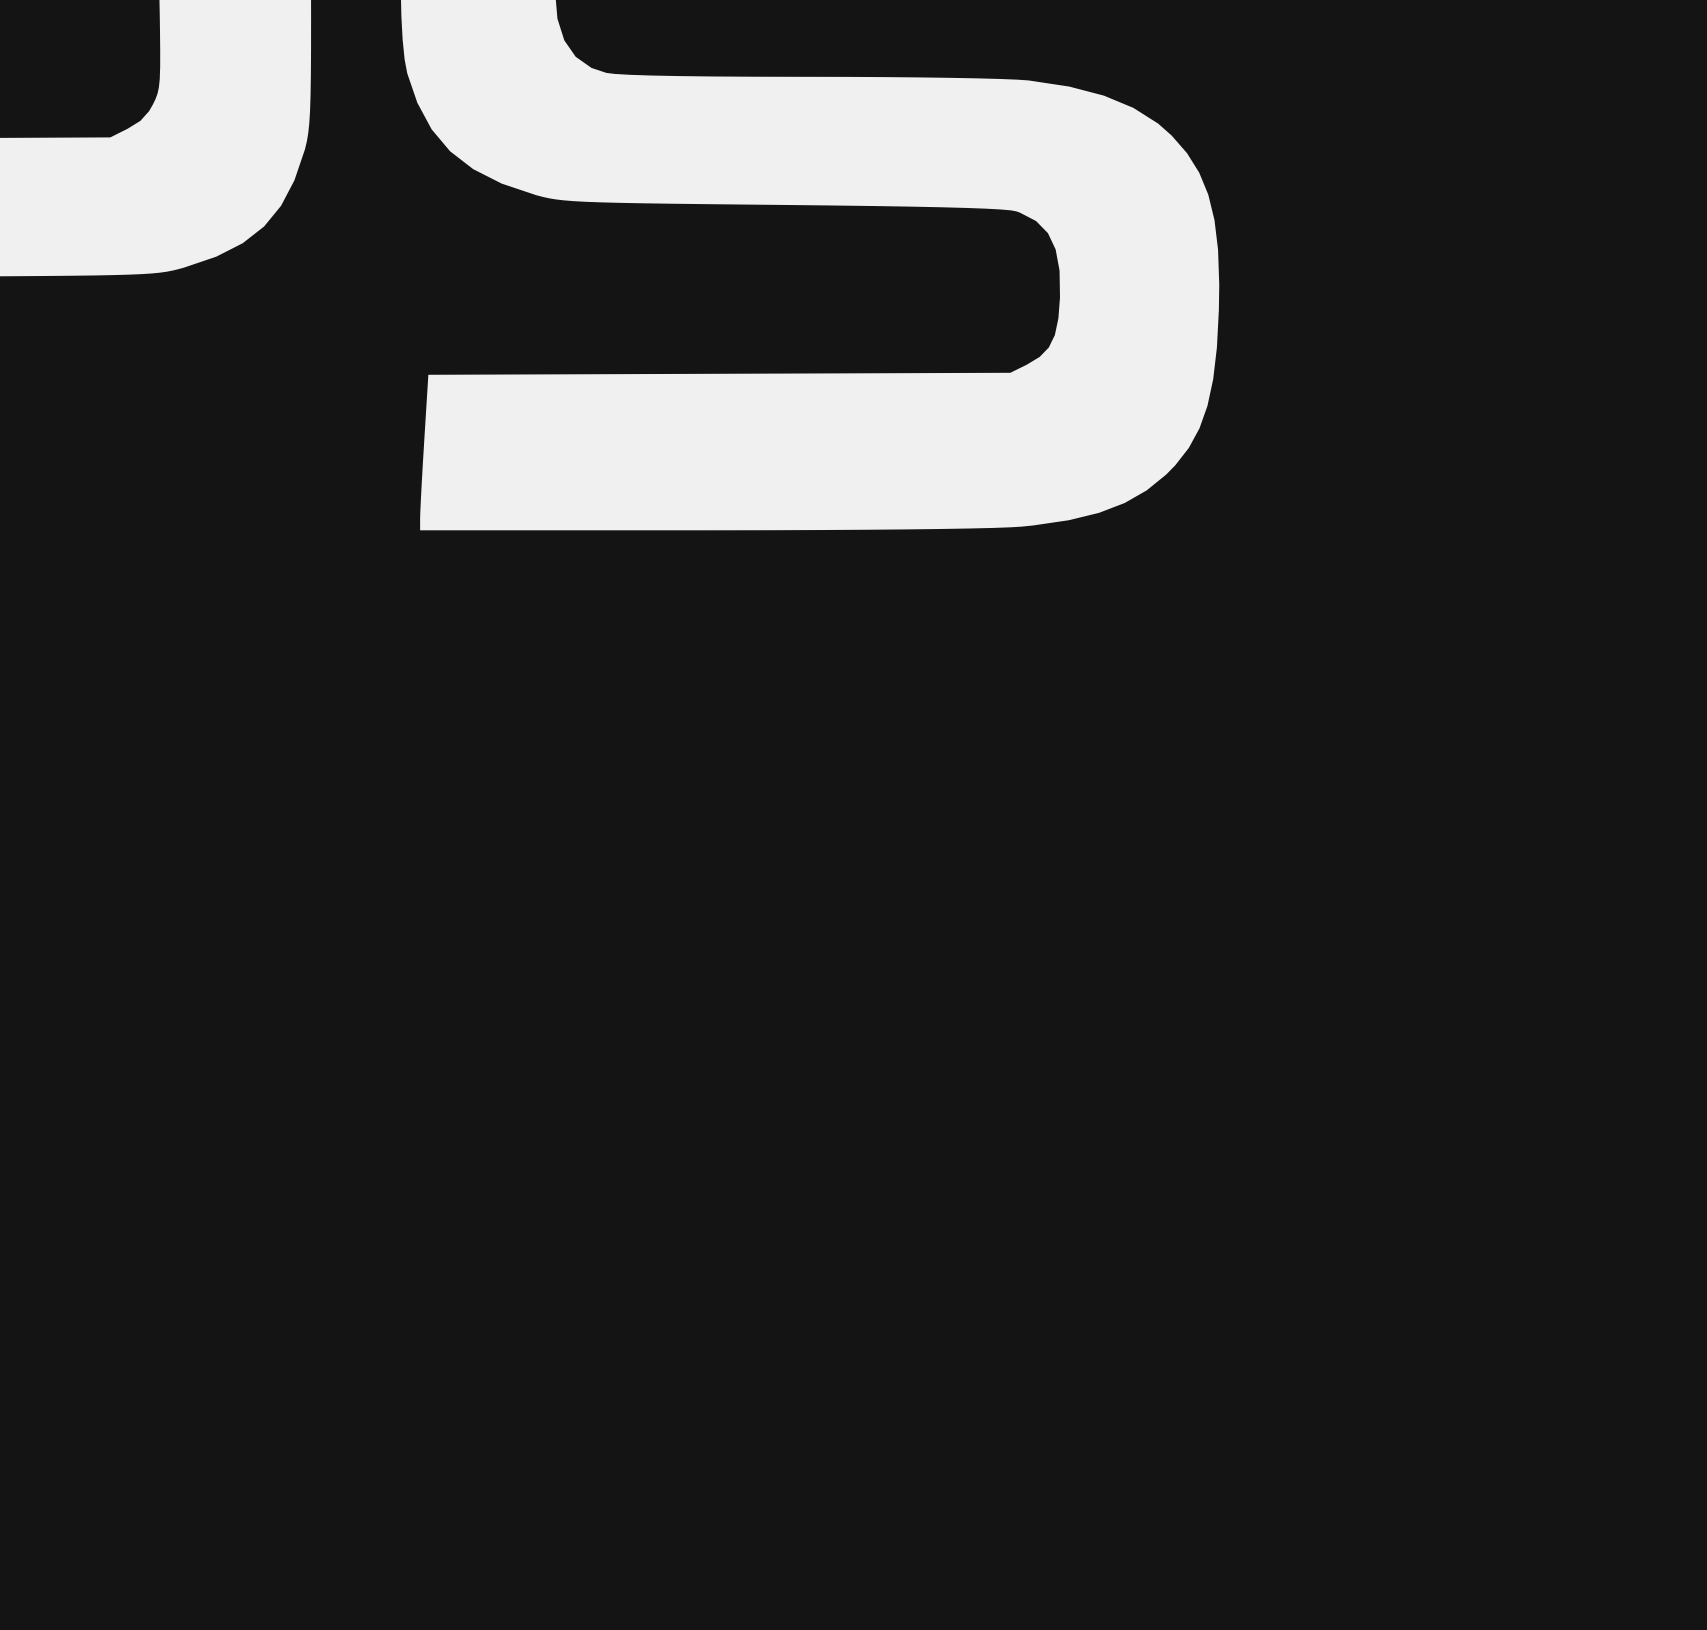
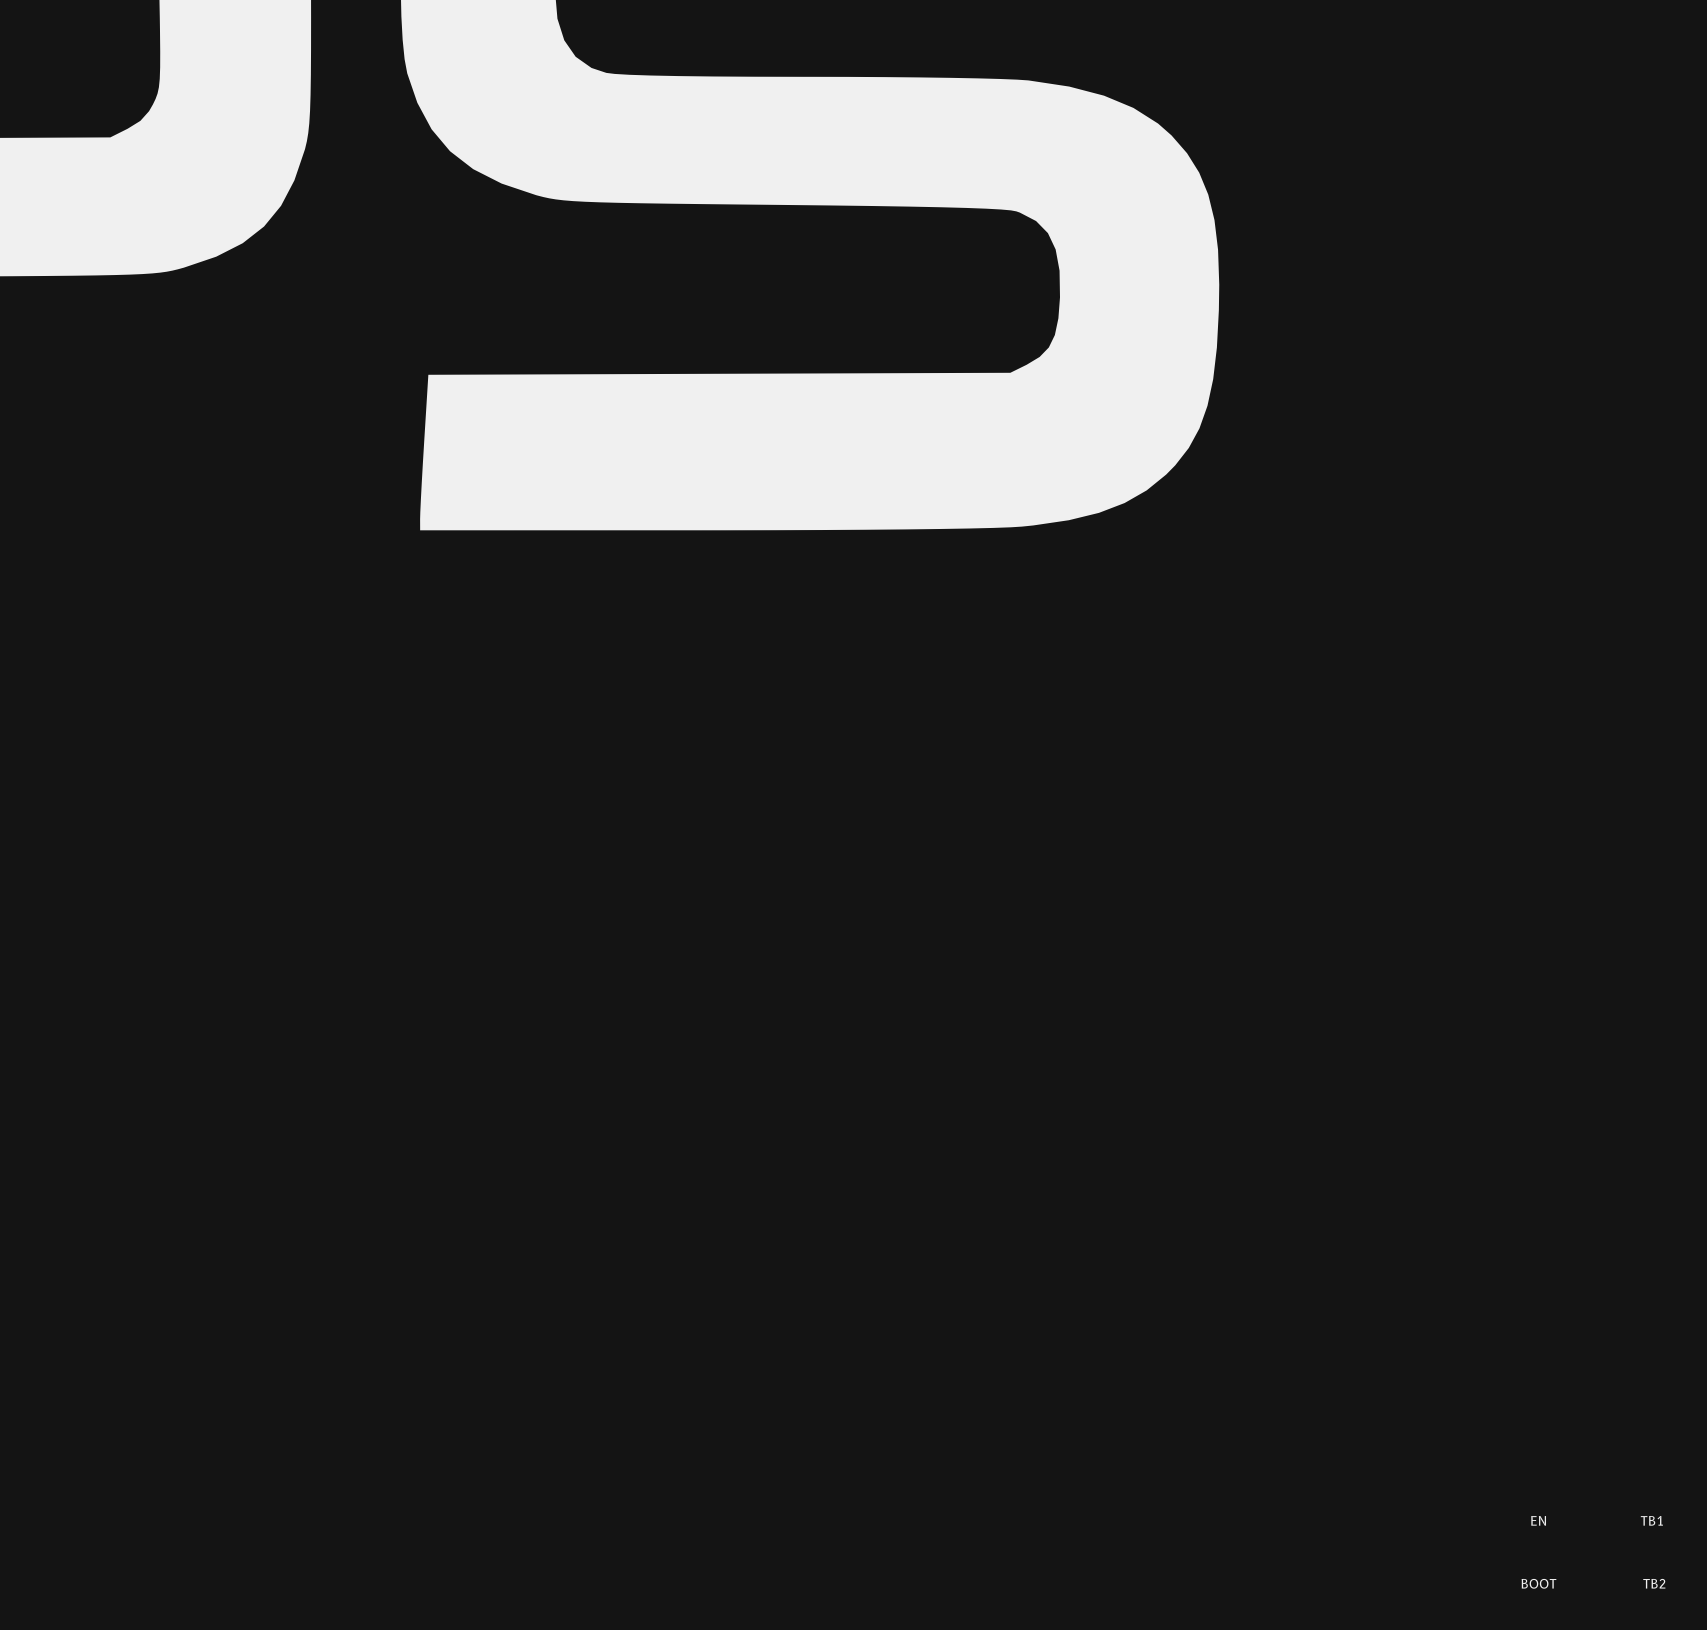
text: none -> EN (1538, 1520)
text: none -> TB1 (1651, 1520)
text: none -> BOOT (1538, 1583)
text: none -> TB2 (1654, 1583)

